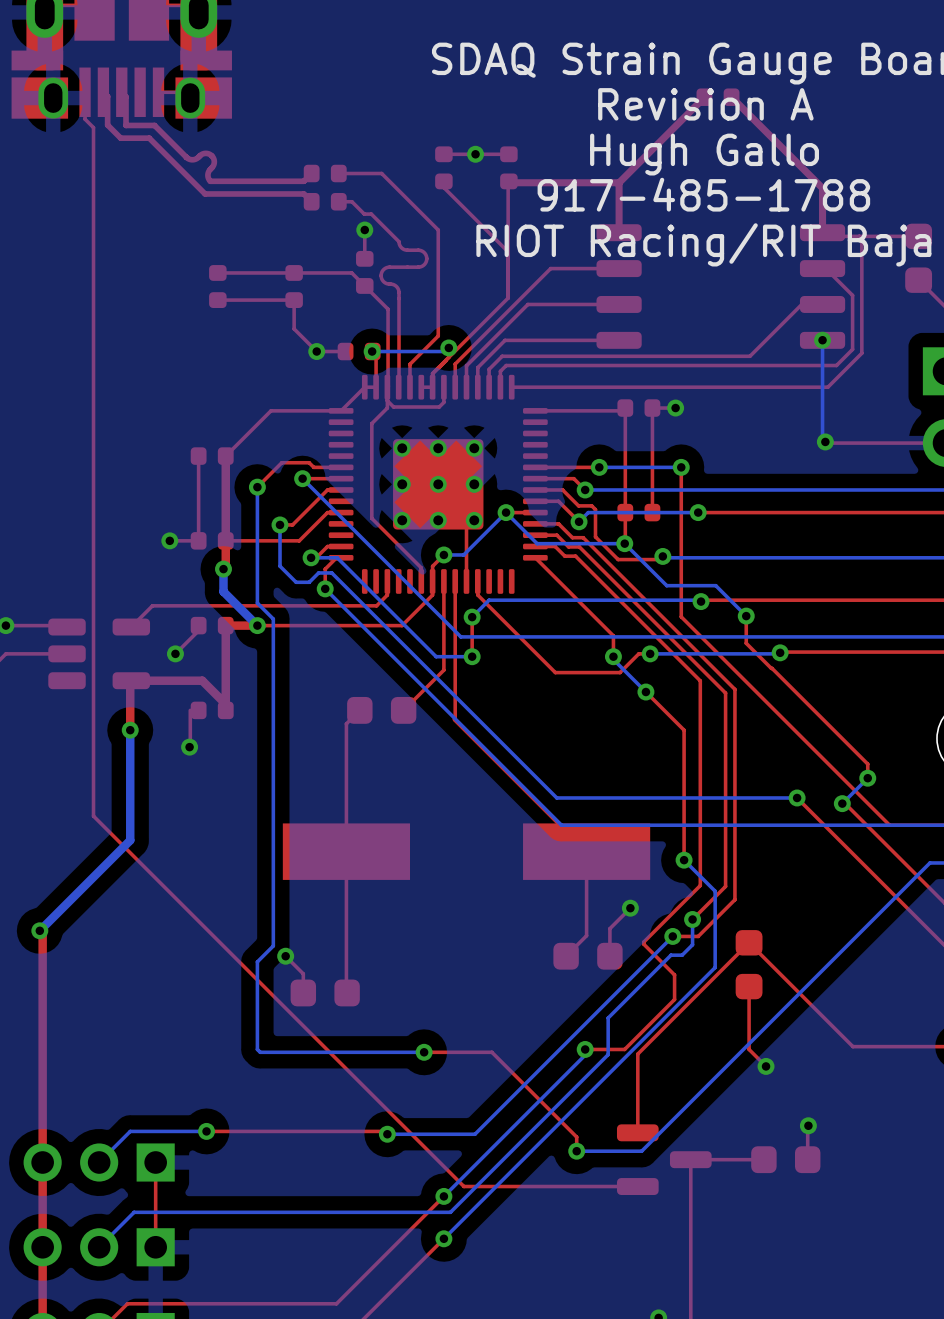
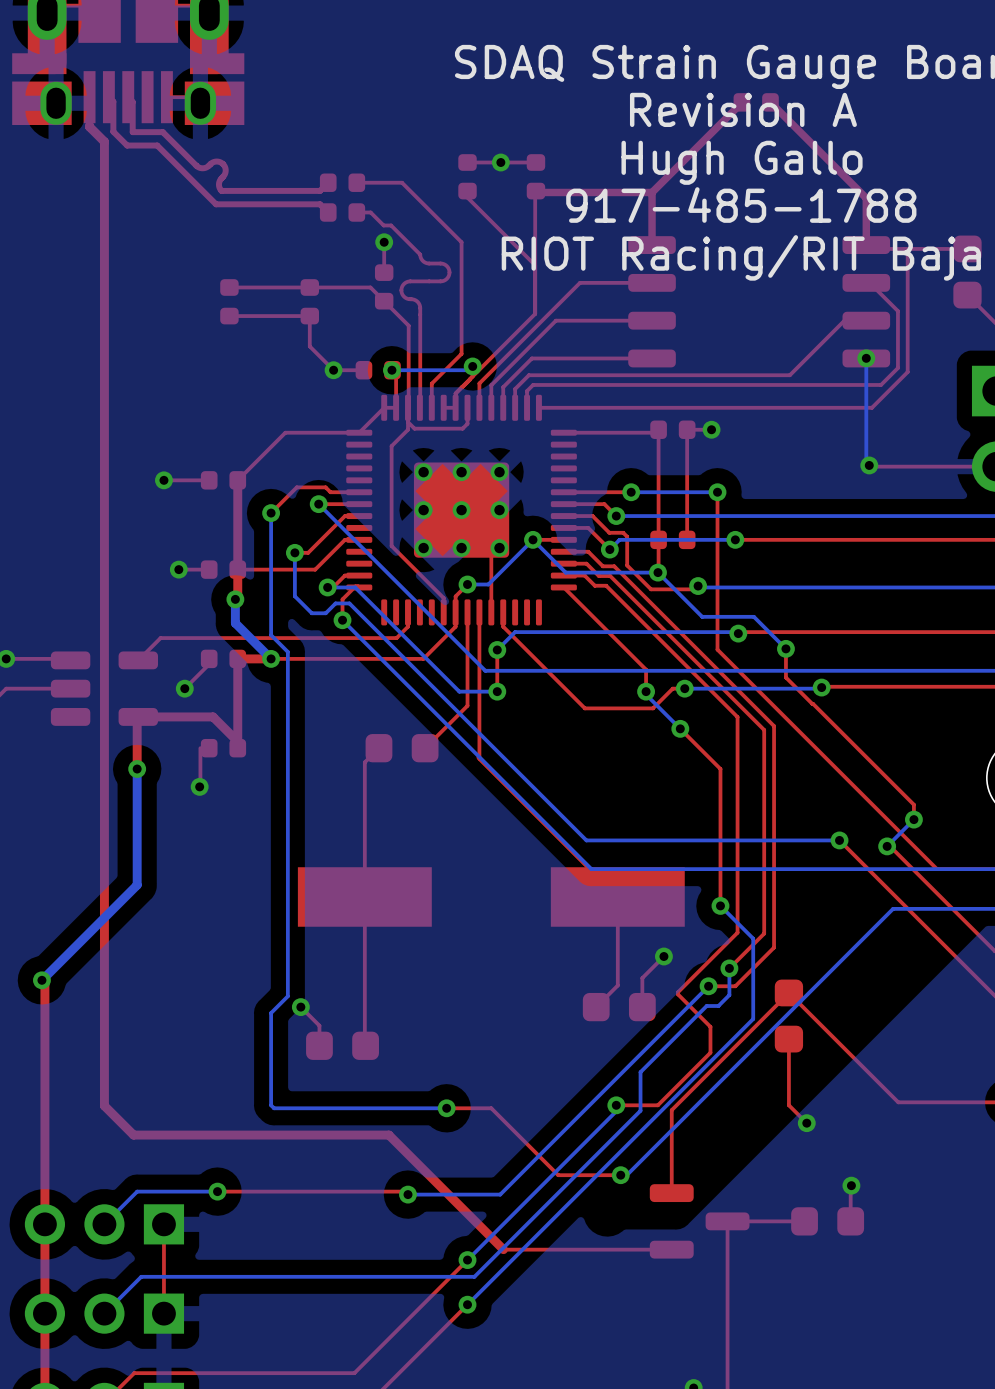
top track: (85, 119) (93, 127) (93, 816) (463, 1186) (478, 1186) -> (89, 125) (104, 141) (104, 1105) (133, 1135) (388, 1135) (503, 1249)
via: none -> (163, 480)
top track: (198, 456) (198, 540) -> (209, 480) (163, 480)
bottom track: (929, 862) (641, 1151) (576, 1151) -> (979, 908) (893, 908) (626, 1175) (620, 1175)
top track: (466, 1052) (491, 1052) (576, 1137) (576, 1151) -> (491, 1108) (558, 1175) (620, 1175)
via position: (576, 1151) -> (620, 1175)

